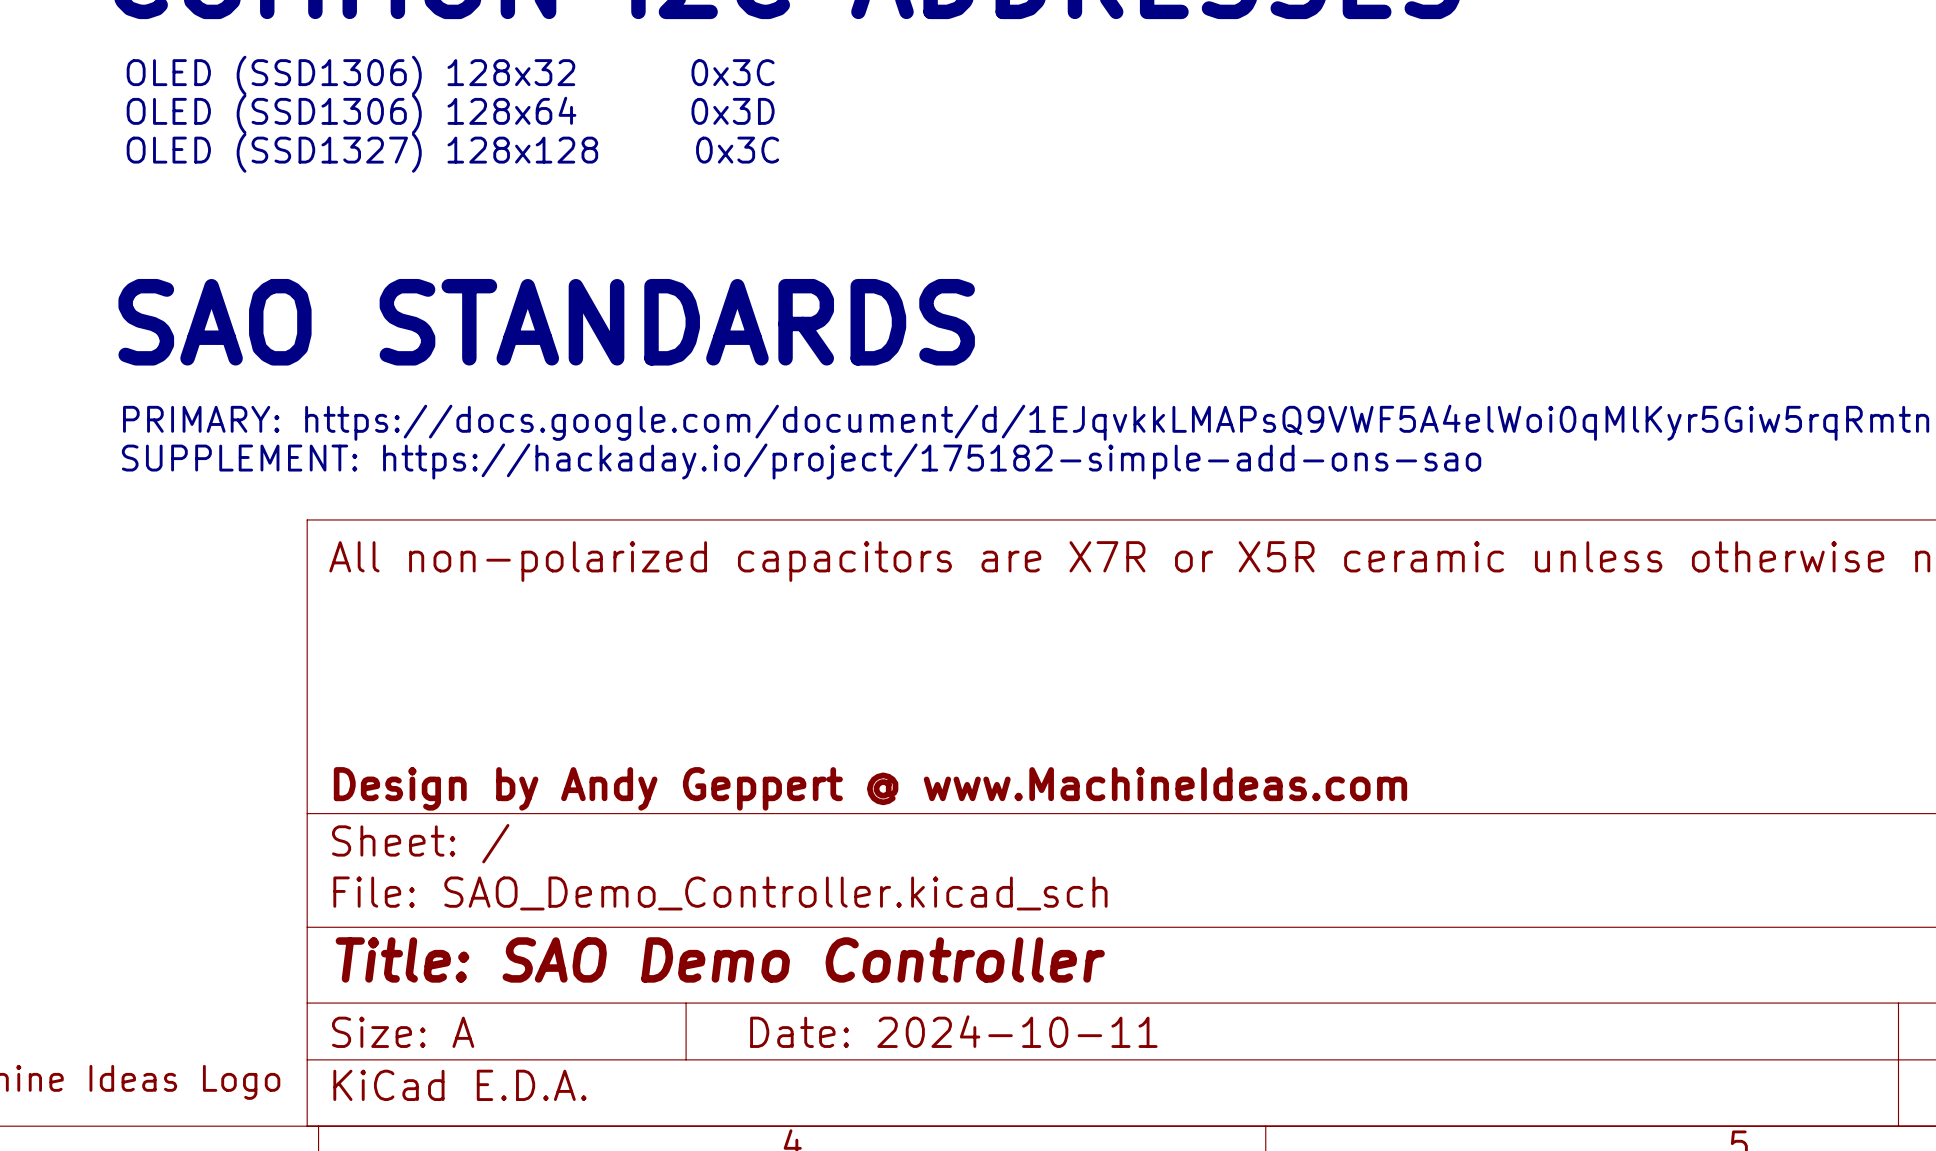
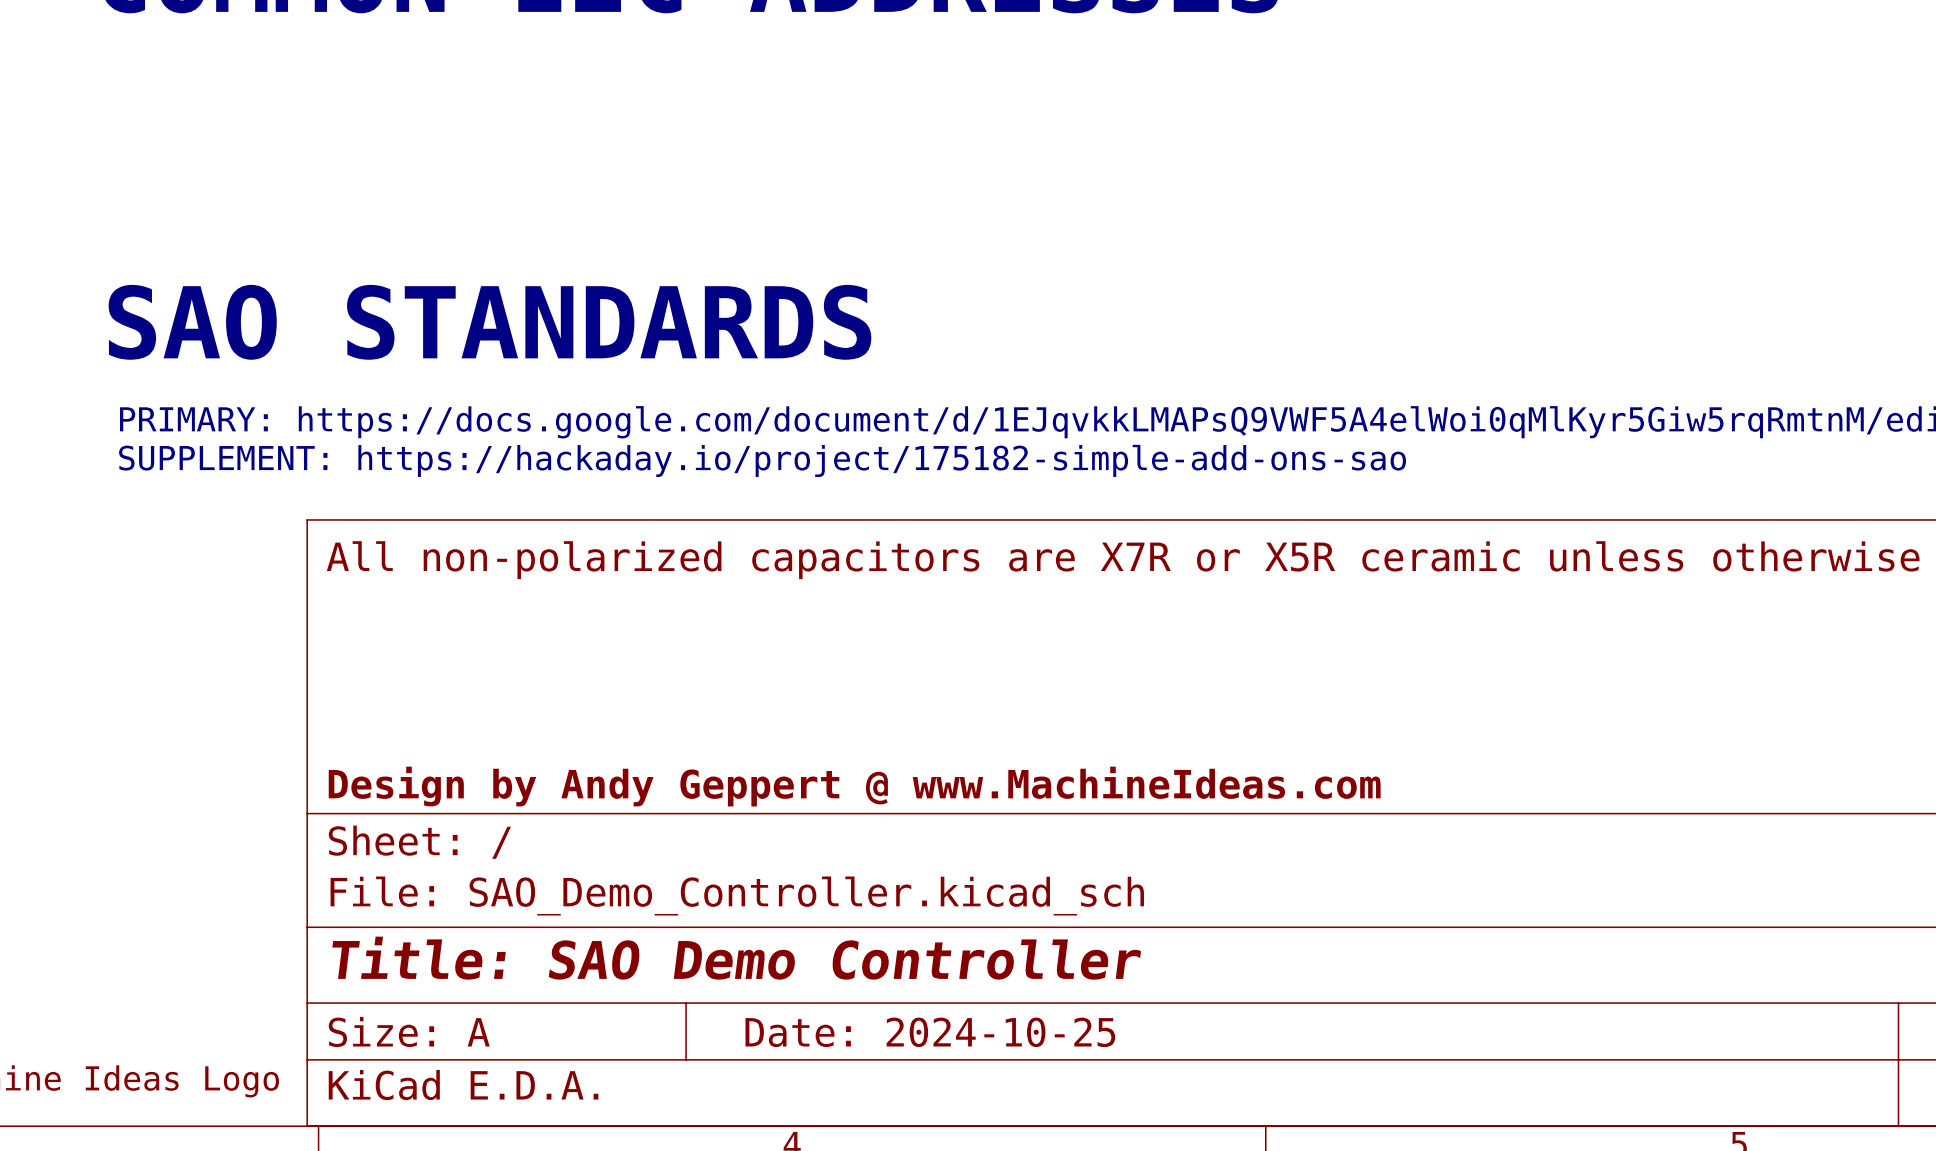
text: OLED (SSD1306) 128x32 0x3C (450, 75) -> none
text: OLED (SSD1306) 128x64 0x3D (450, 114) -> none
text: OLED (SSD1327) 128x128 0x3C (452, 152) -> none
title block: Date: 2024-10-11 (953, 1031) -> Date: 2024-10-25 (930, 1032)

